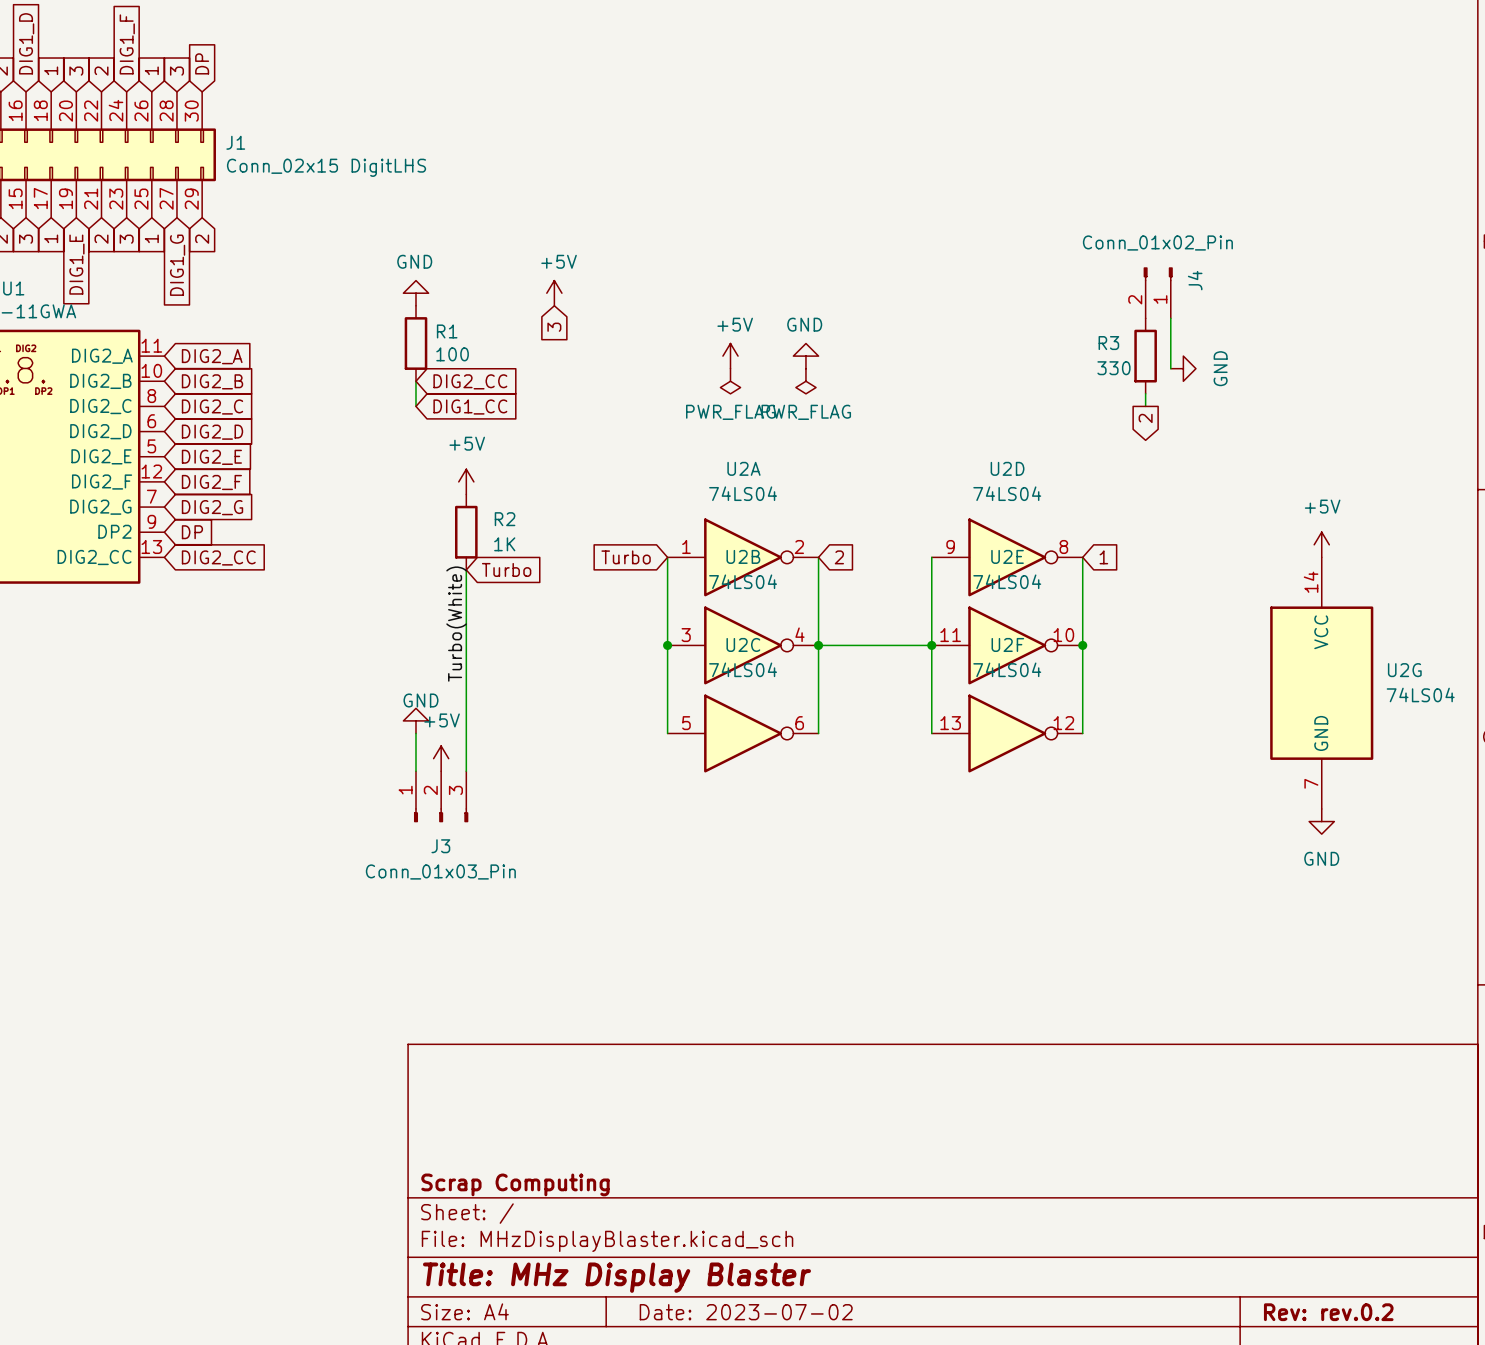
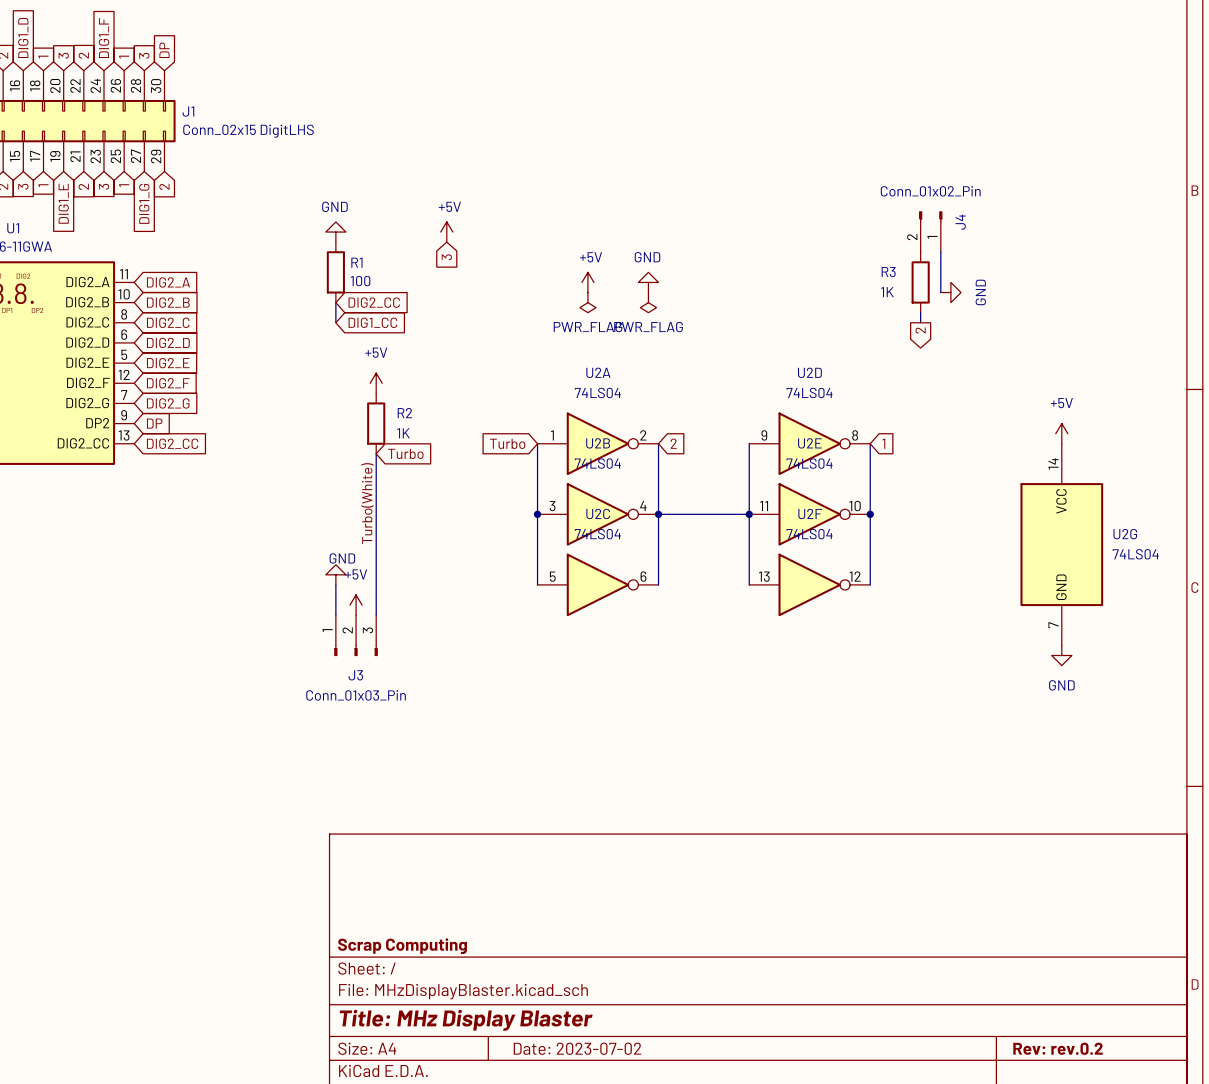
R3 value: 330 (1113, 368) -> 1K (887, 292)

